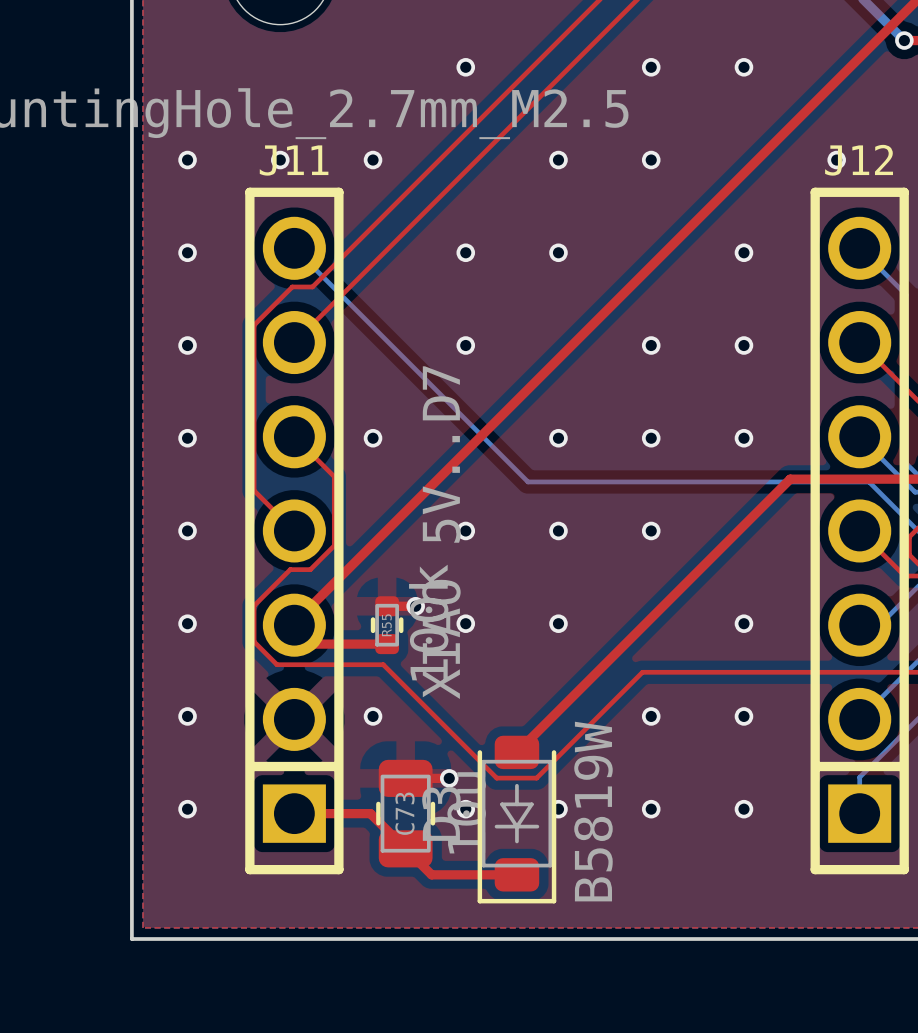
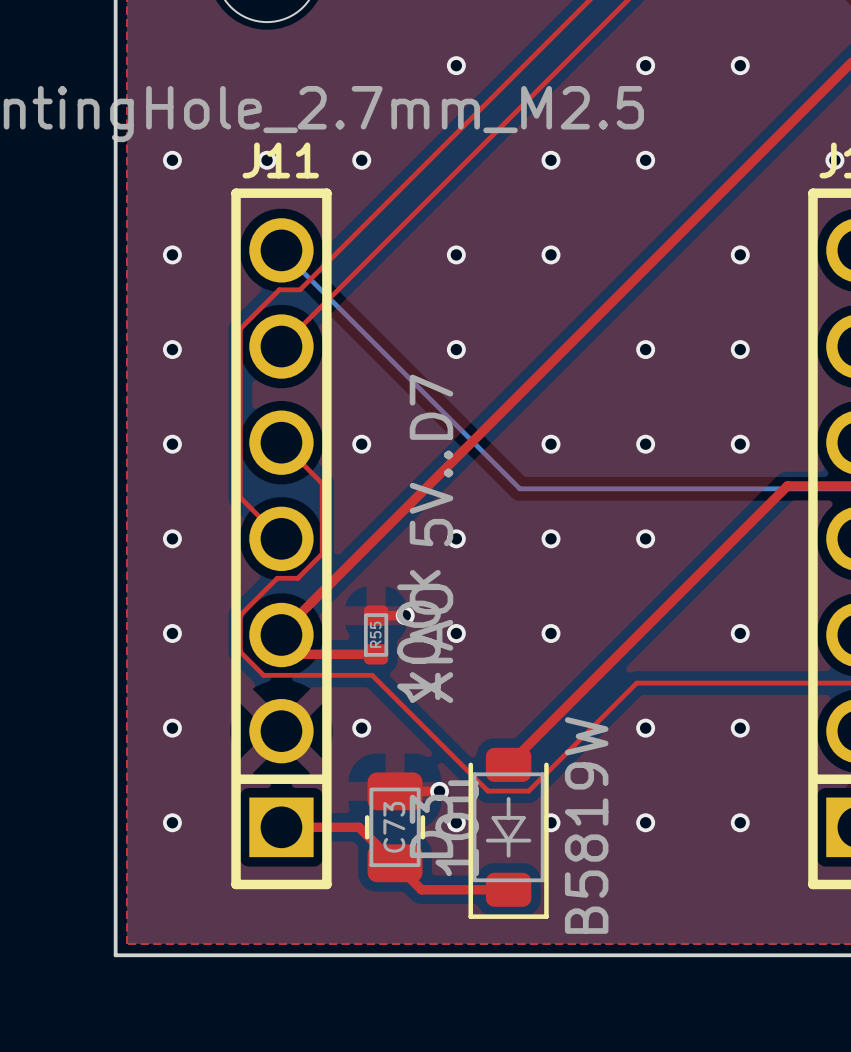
R55 footprint: [370, 596, 404, 655] -> [363, 605, 389, 665]

